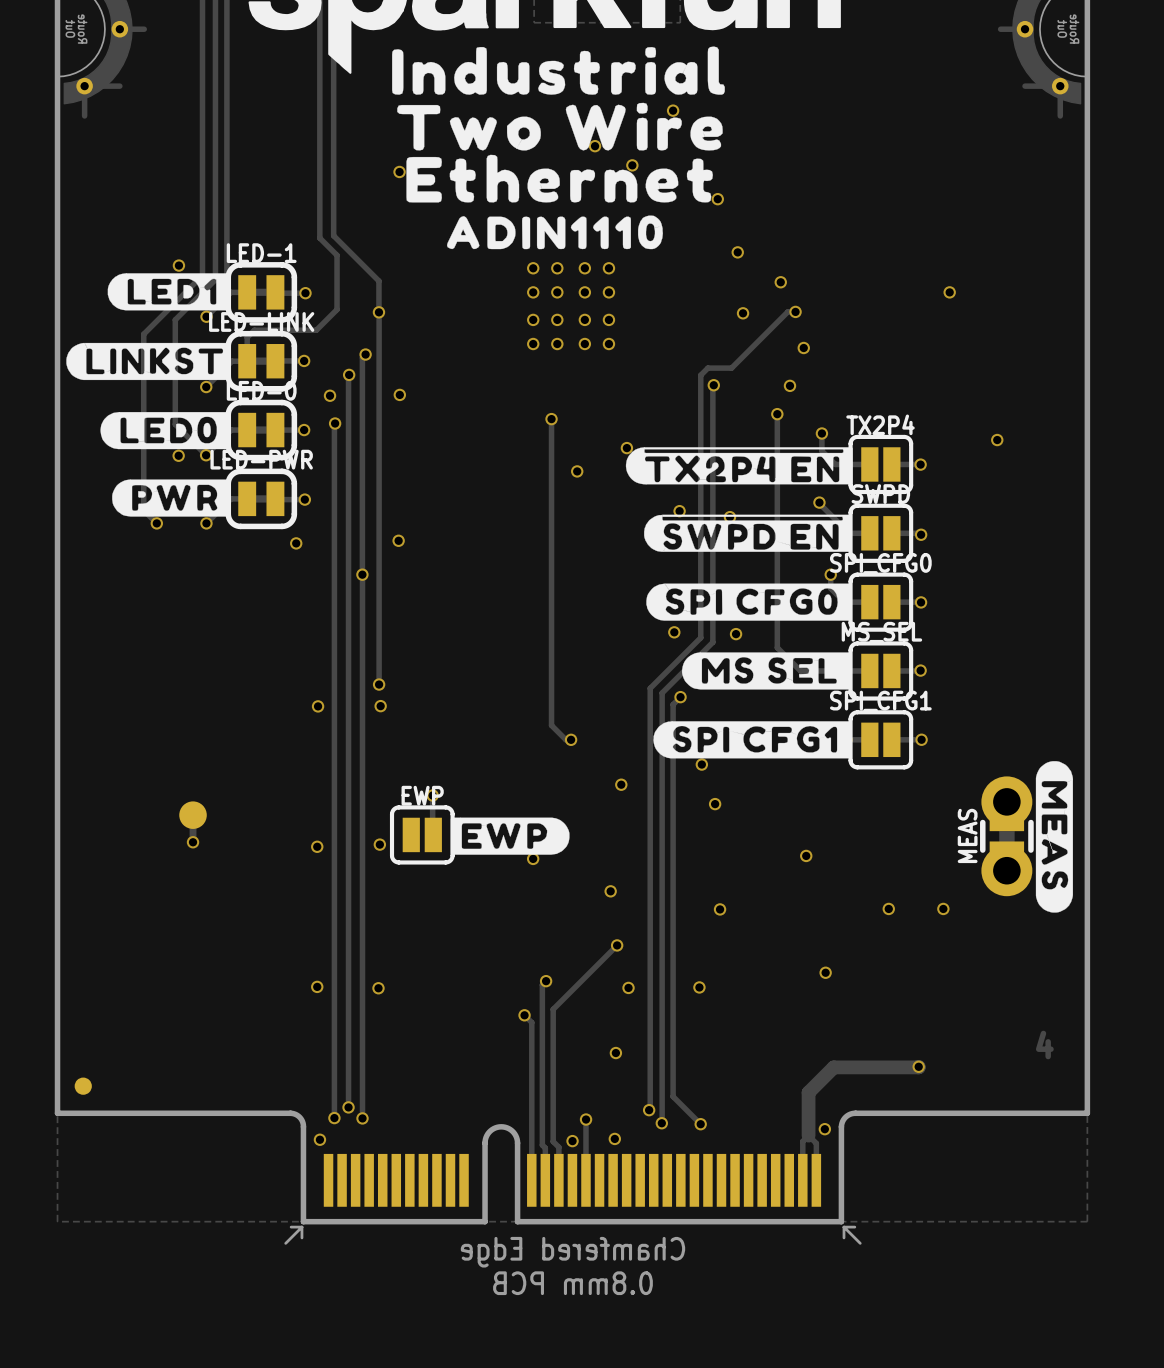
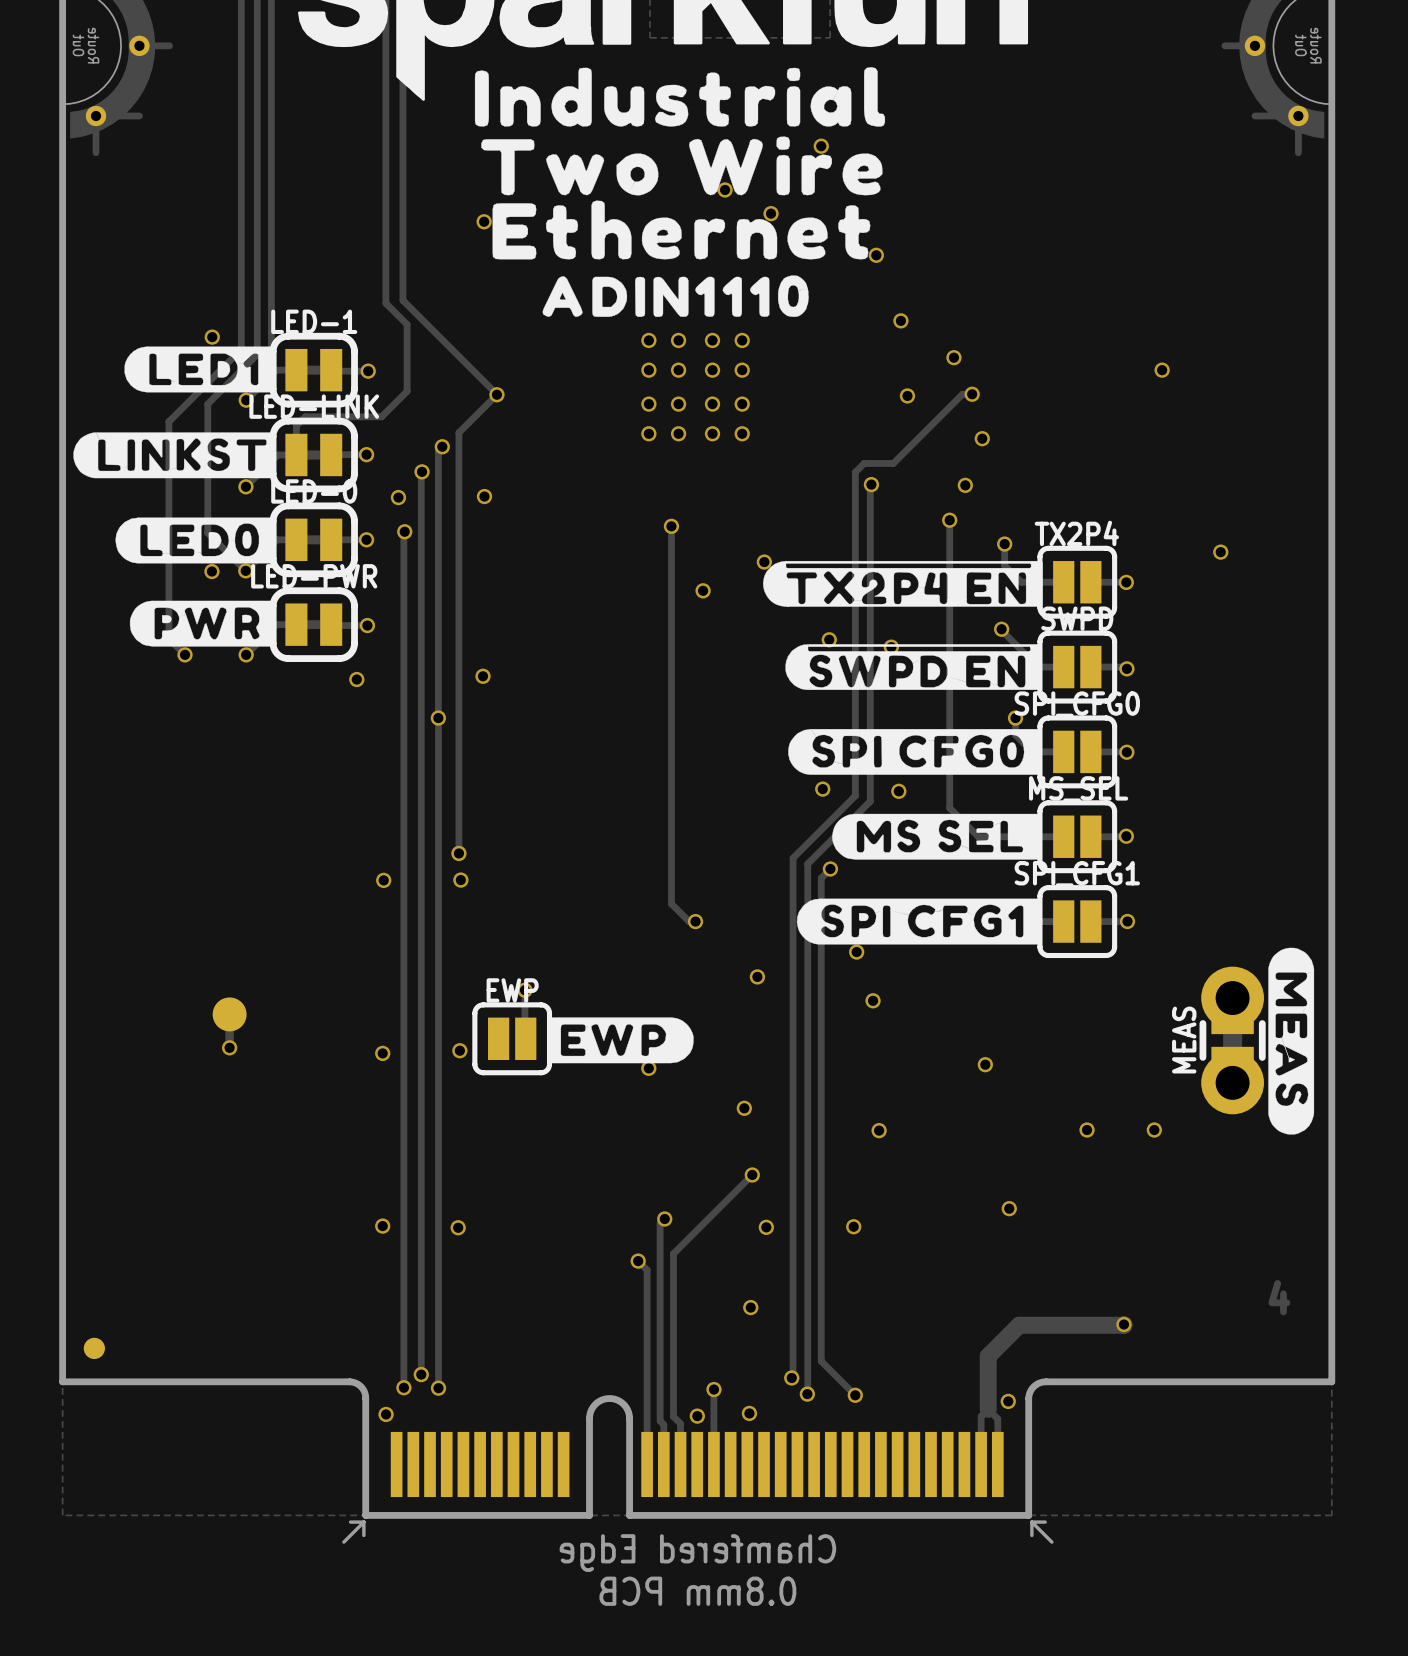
track: (378, 281) (378, 312) -> (458, 356) (496, 394)
via position: (378, 312) -> (496, 394)
track: (379, 312) (379, 343) -> (496, 394) (458, 432)

